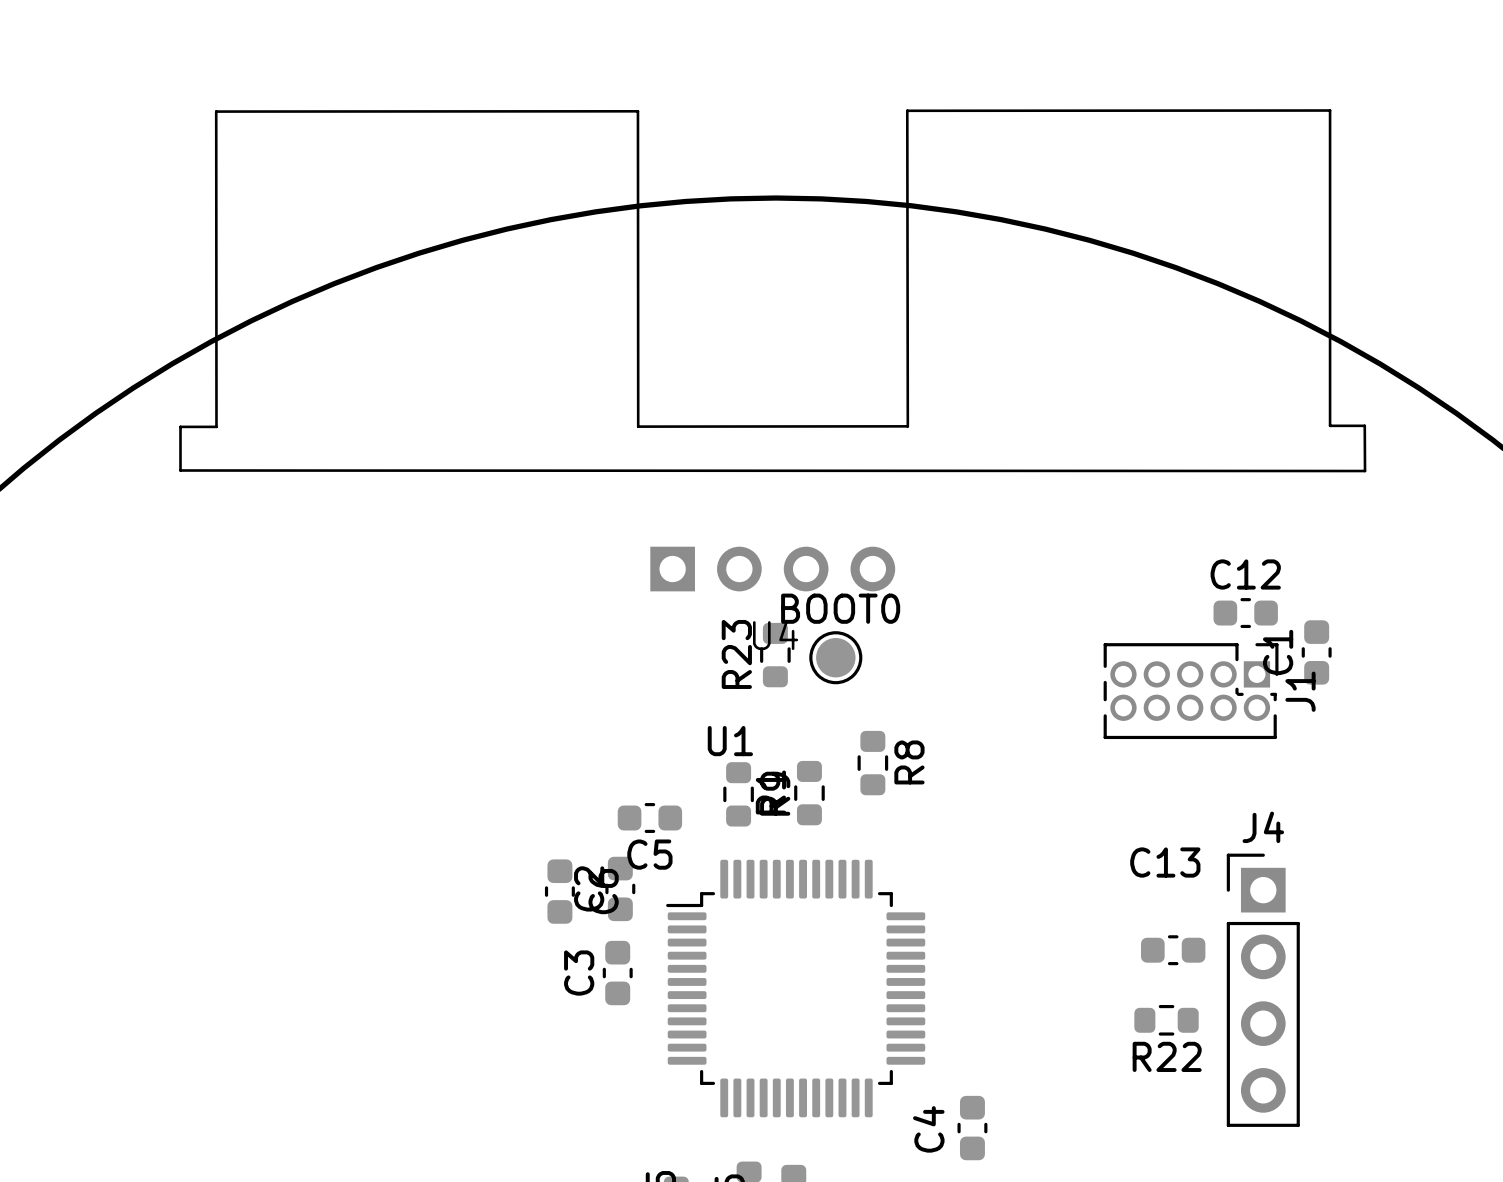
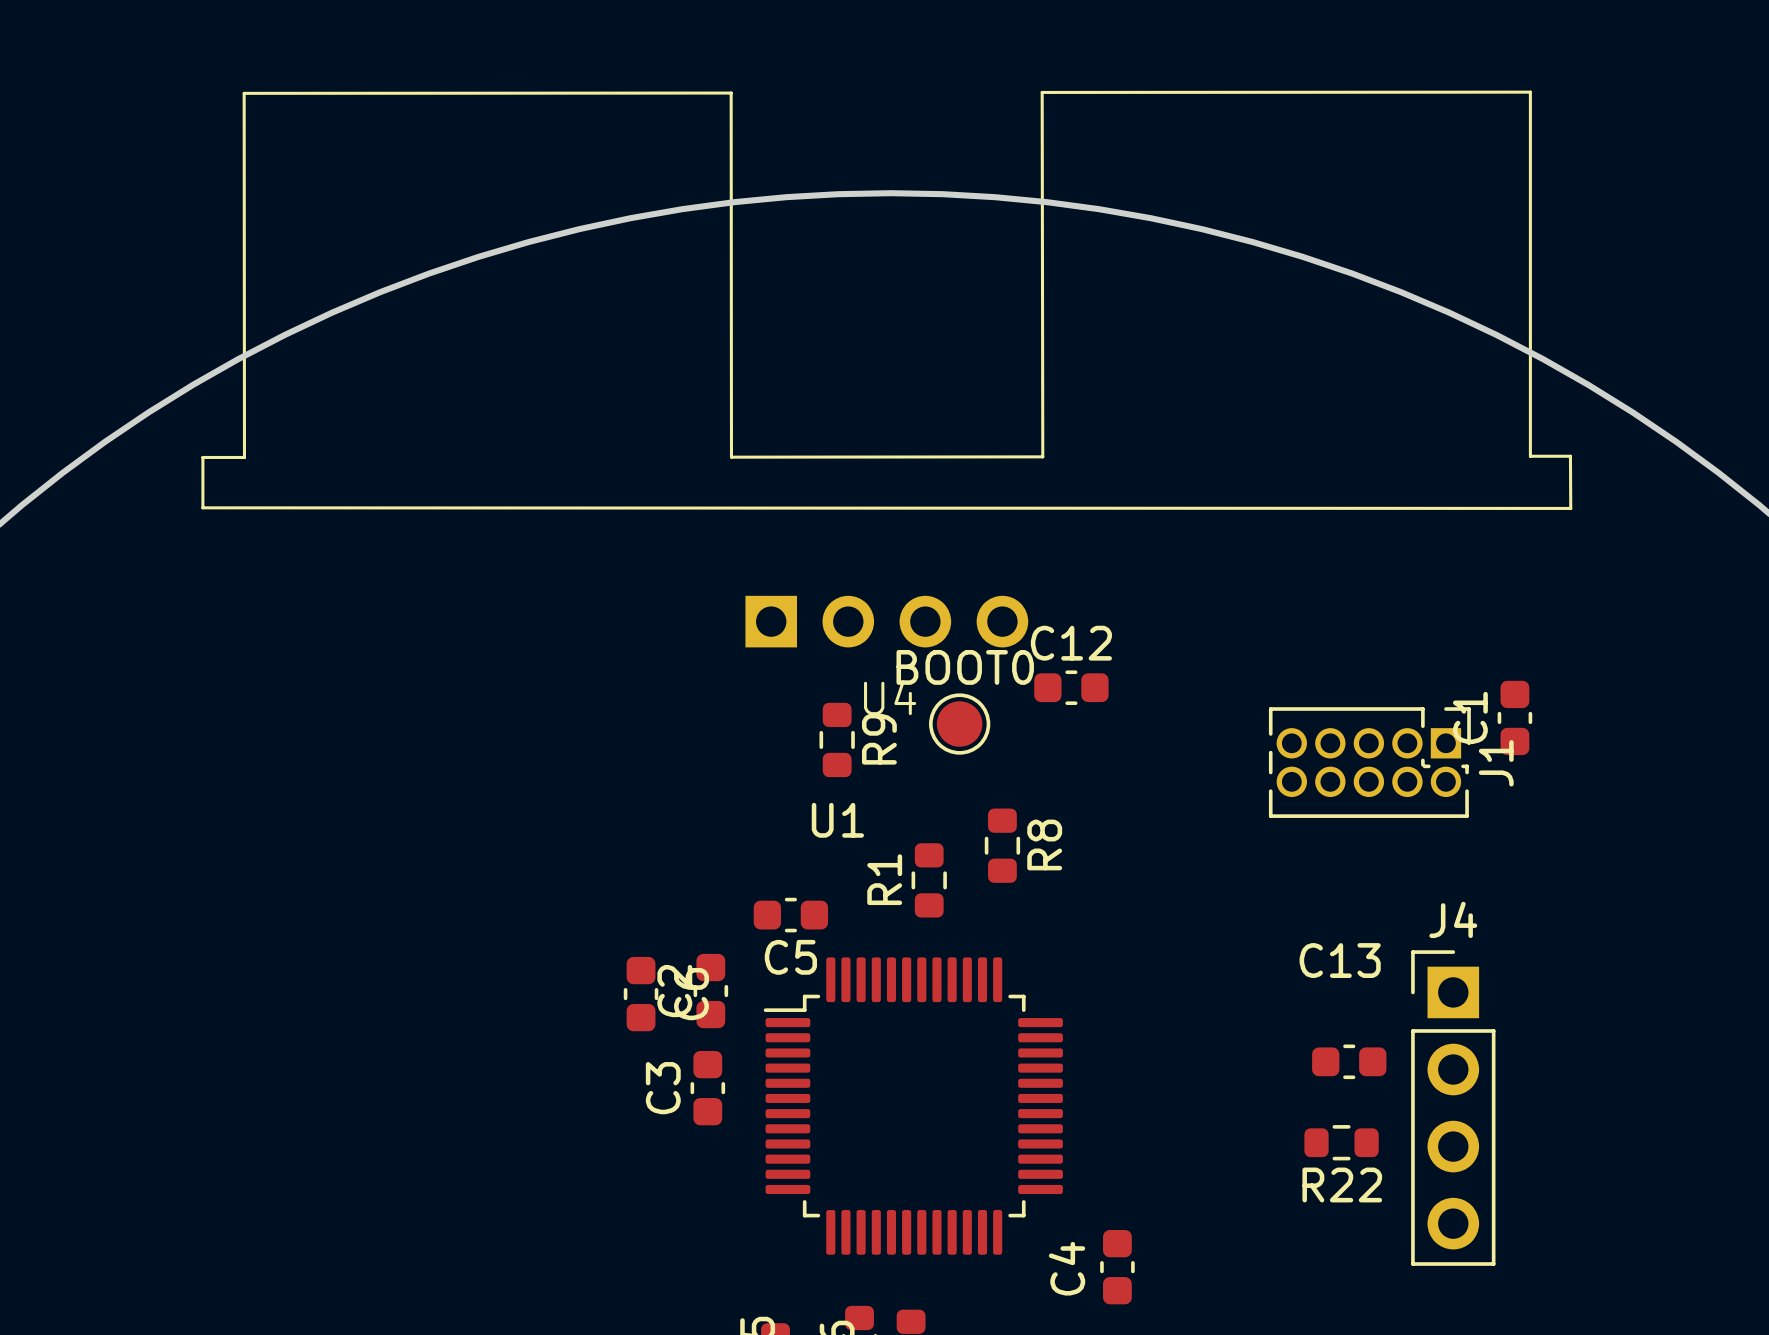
C12 position: (1245, 613) -> (1071, 687)
R23: (775, 655) -> none
R9 position: (738, 794) -> (837, 739)
C5 position: (649, 818) -> (790, 915)

